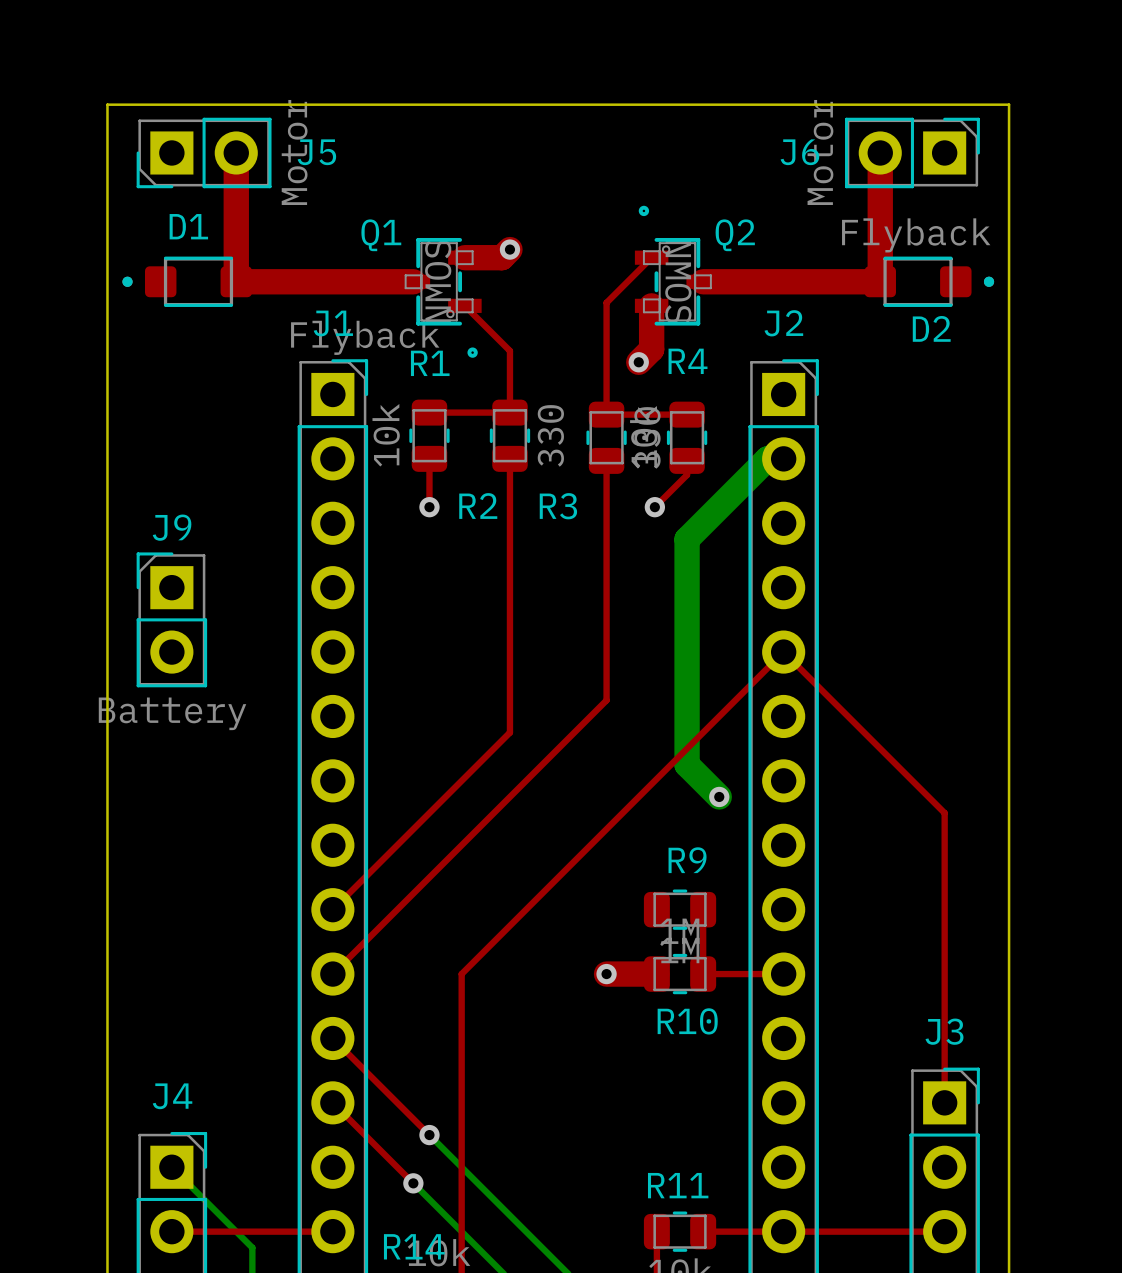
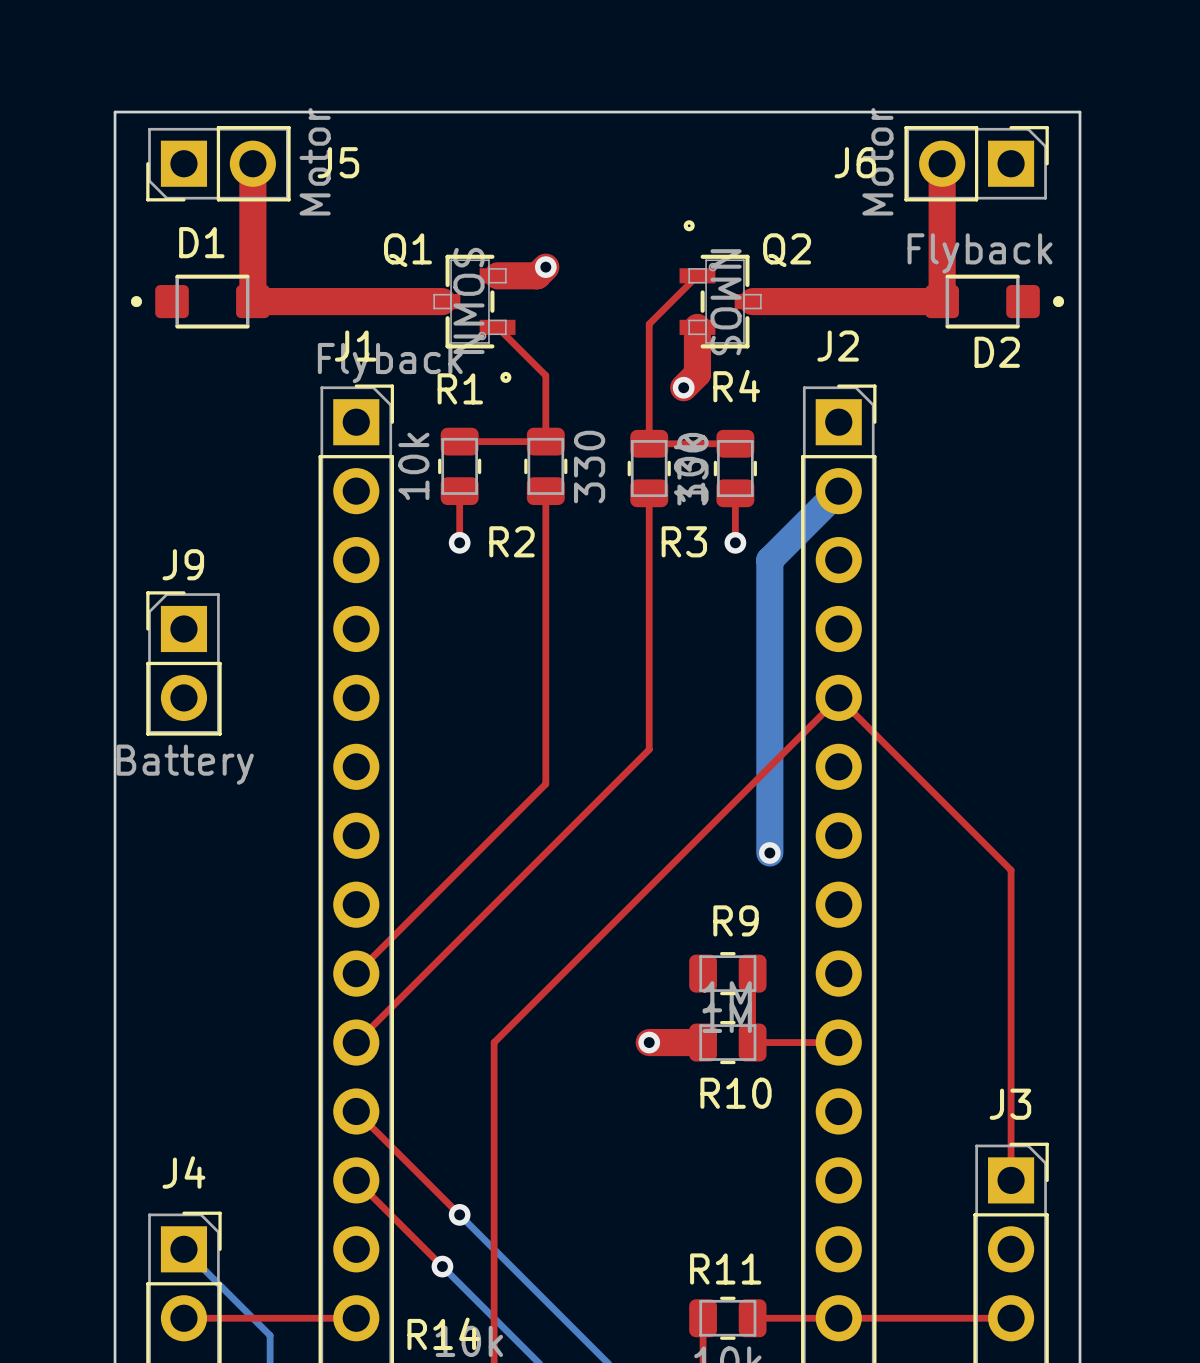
bottom track: (783, 458) (767, 458) (687, 539) (687, 764) (719, 796) -> (838, 491) (769, 560) (769, 853)
top track: (687, 474) (654, 507) -> (735, 508) (735, 542)
R3 name position: R3 (558, 506) -> R3 (684, 541)
via position: (654, 507) -> (735, 542)

